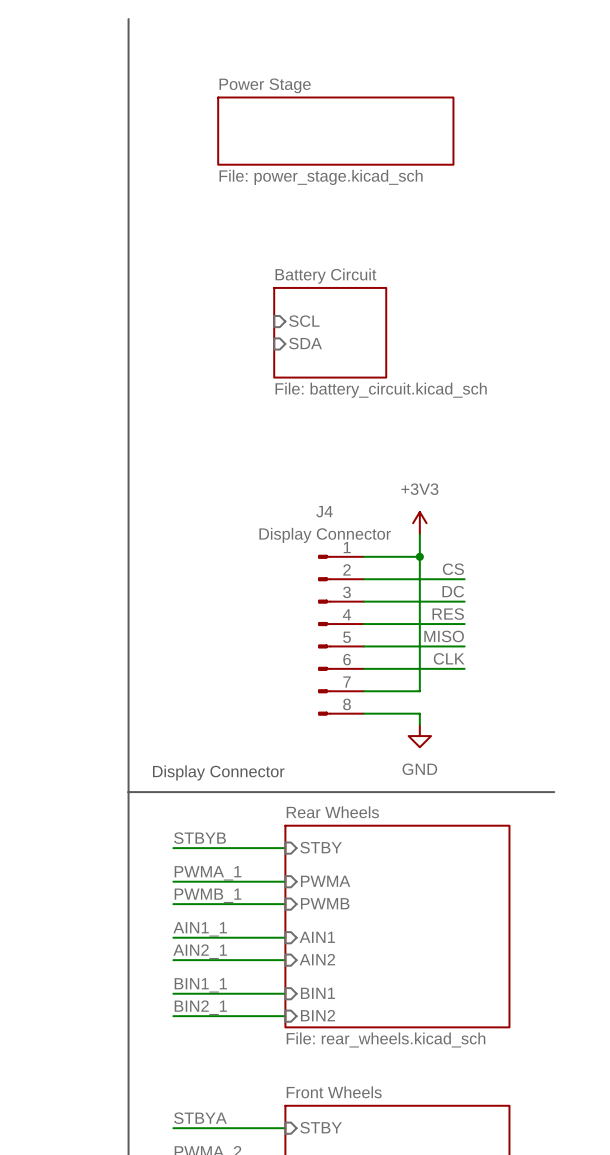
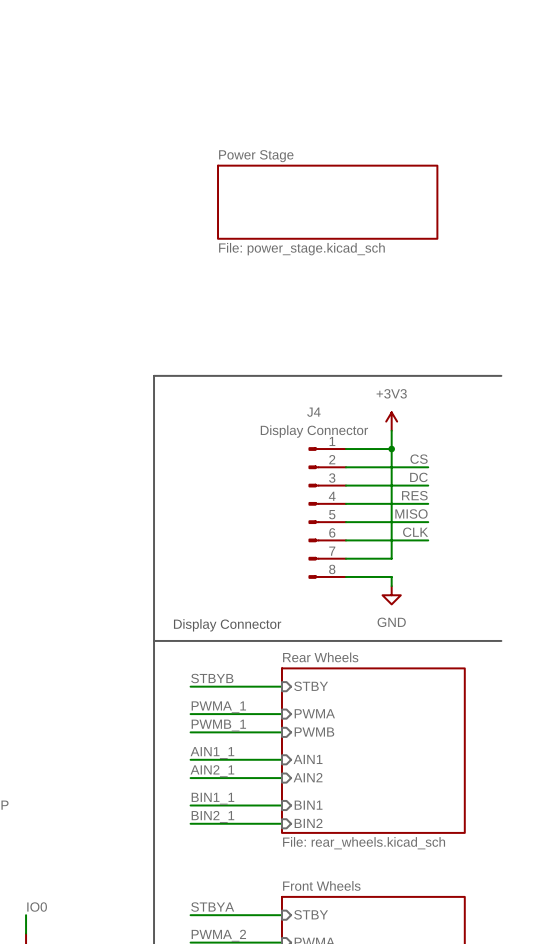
line: (128, 19) (128, 467) -> (501, 375) (154, 375)
sheet Power Stage: File: power_stage.kicad_sch (335, 131) -> none
sheet Power Stage: none -> File: power_stage.kicad_sch (327, 202)
sheet pin: SCL (304, 321) -> none
sheet Battery Circuit: File: battery_circuit.kicad_sch (330, 332) -> none
sheet pin: SDA (305, 343) -> none

